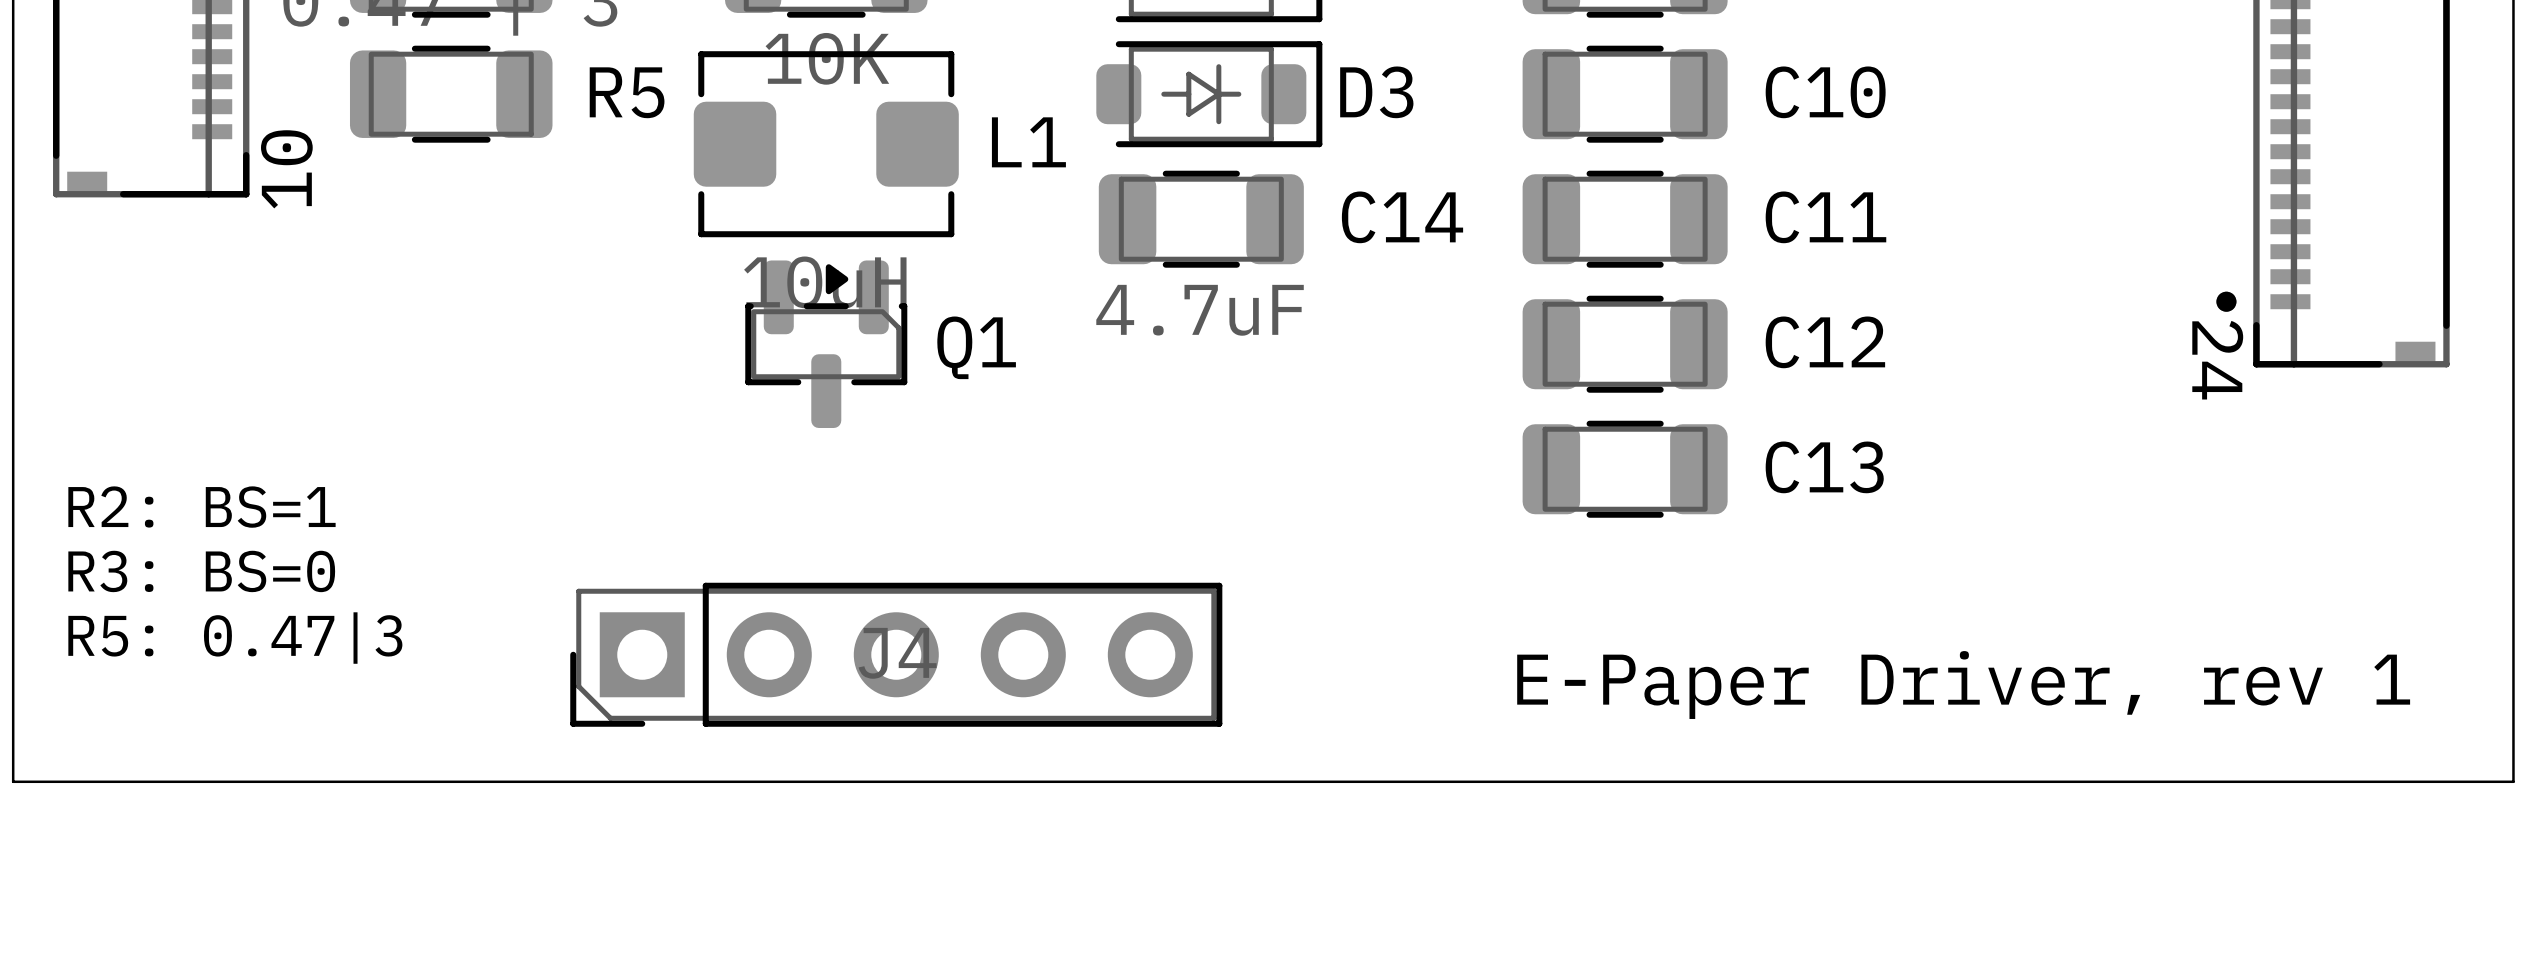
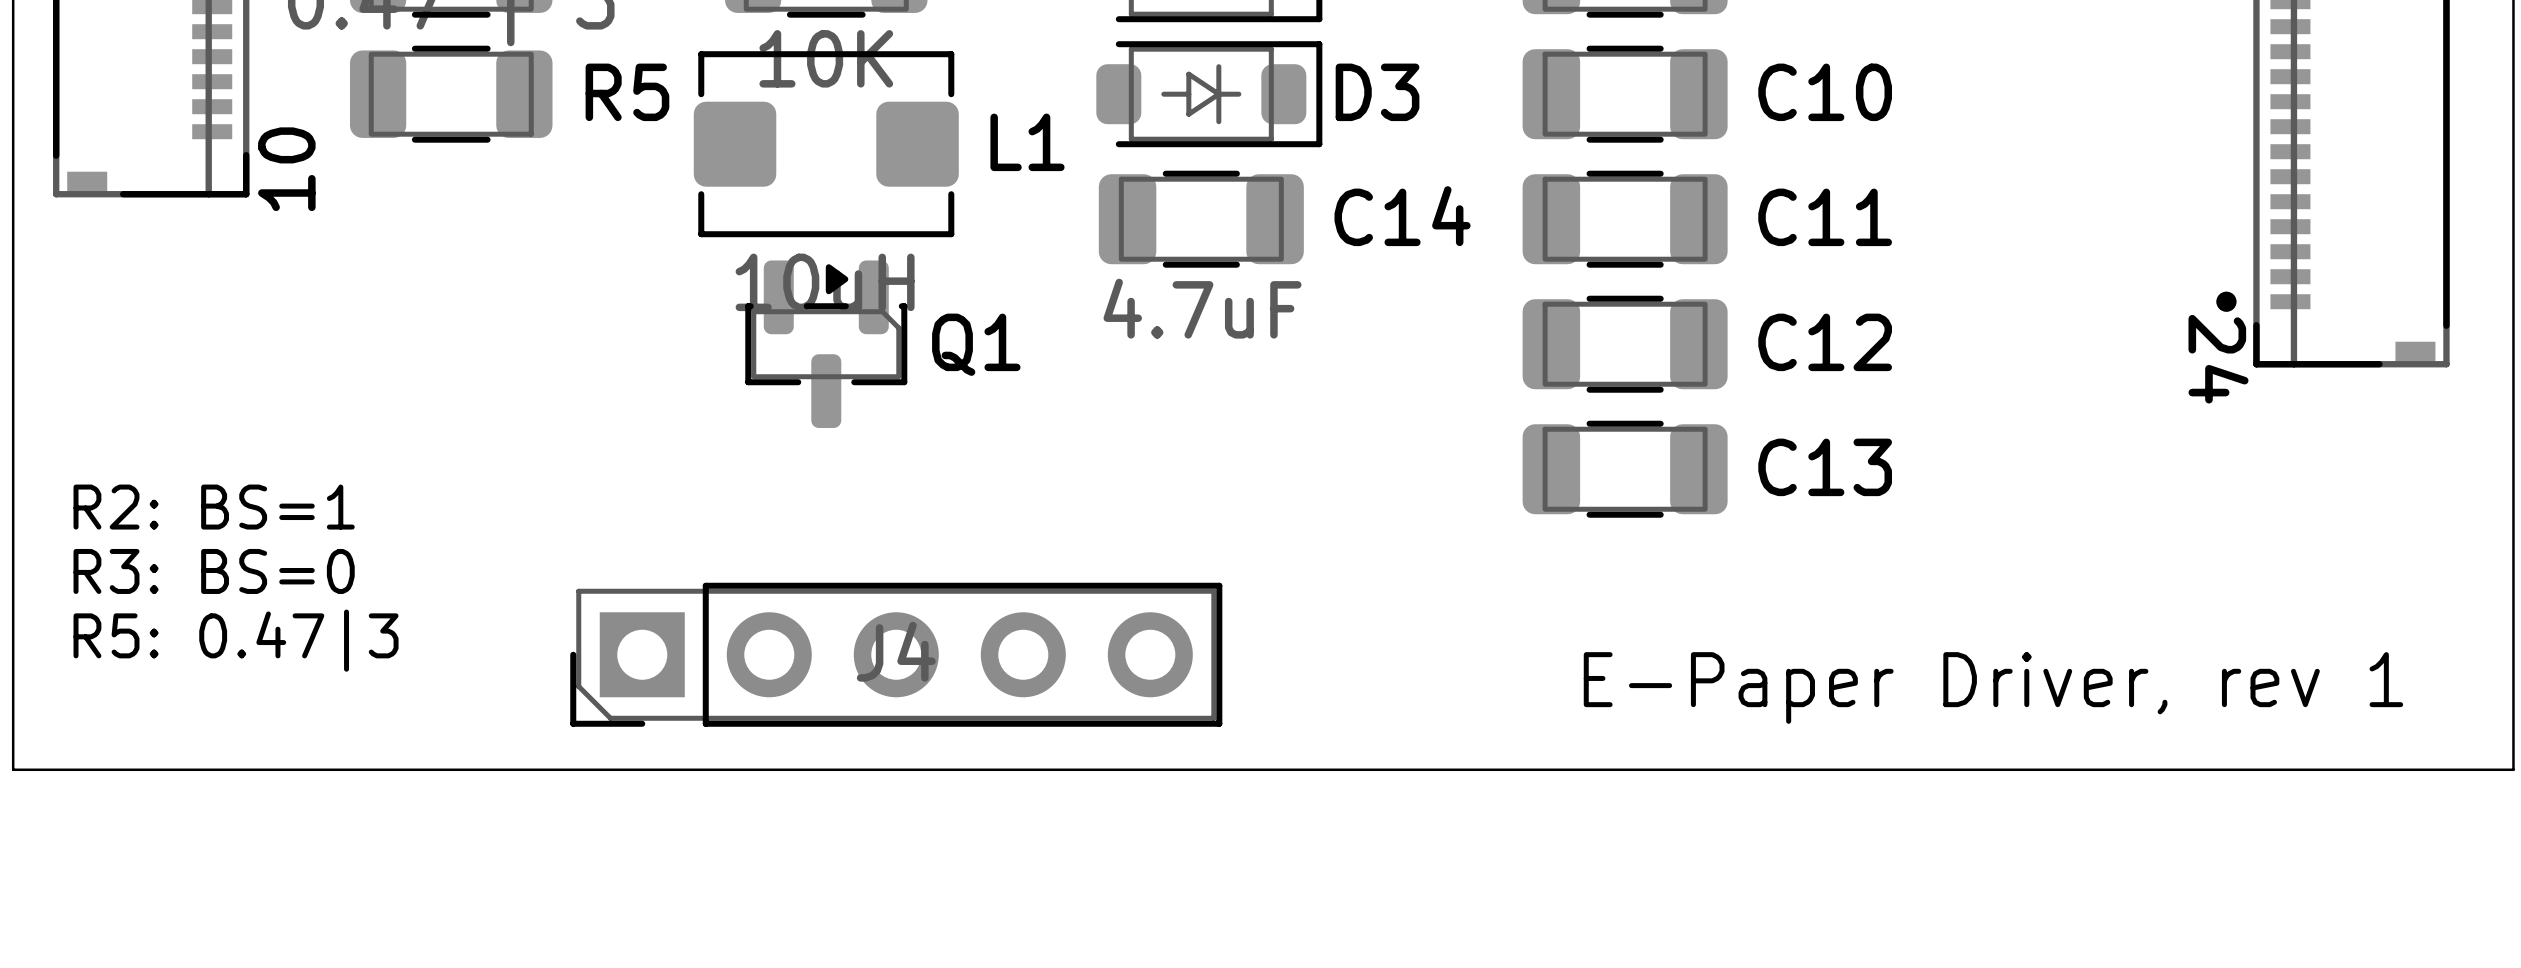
board edge: (13, 769) (13, 781) (2513, 781) (2513, 769) -> (13, 769) (2513, 769)

